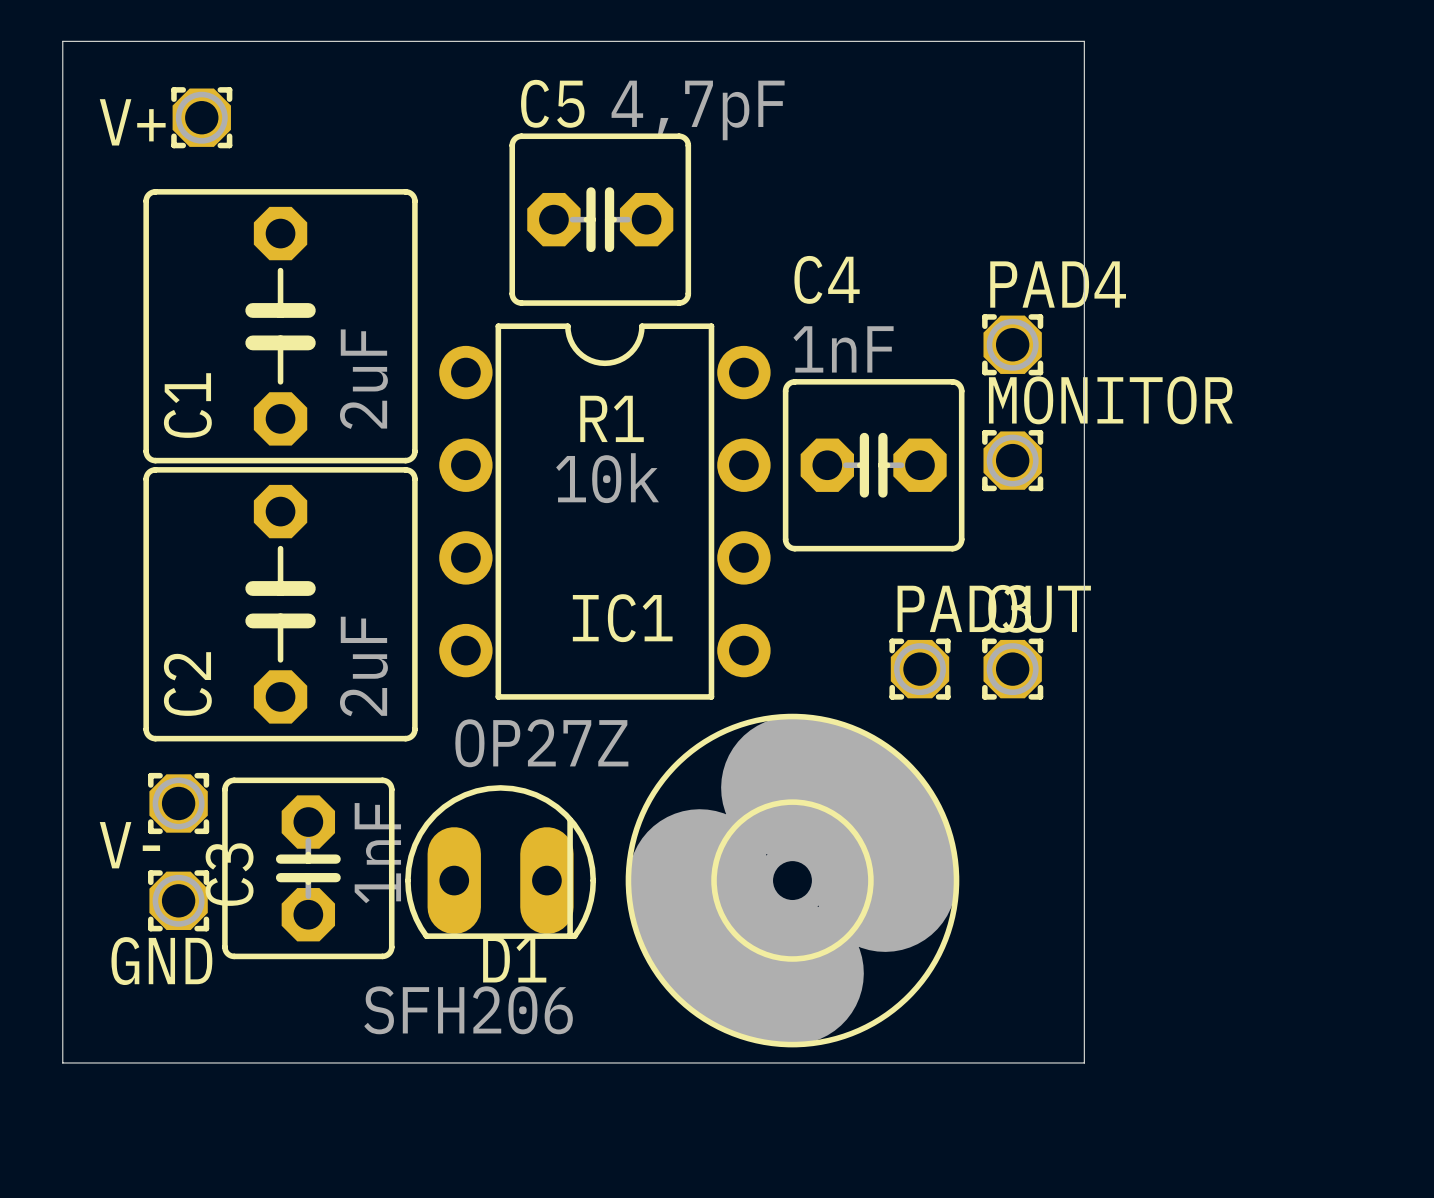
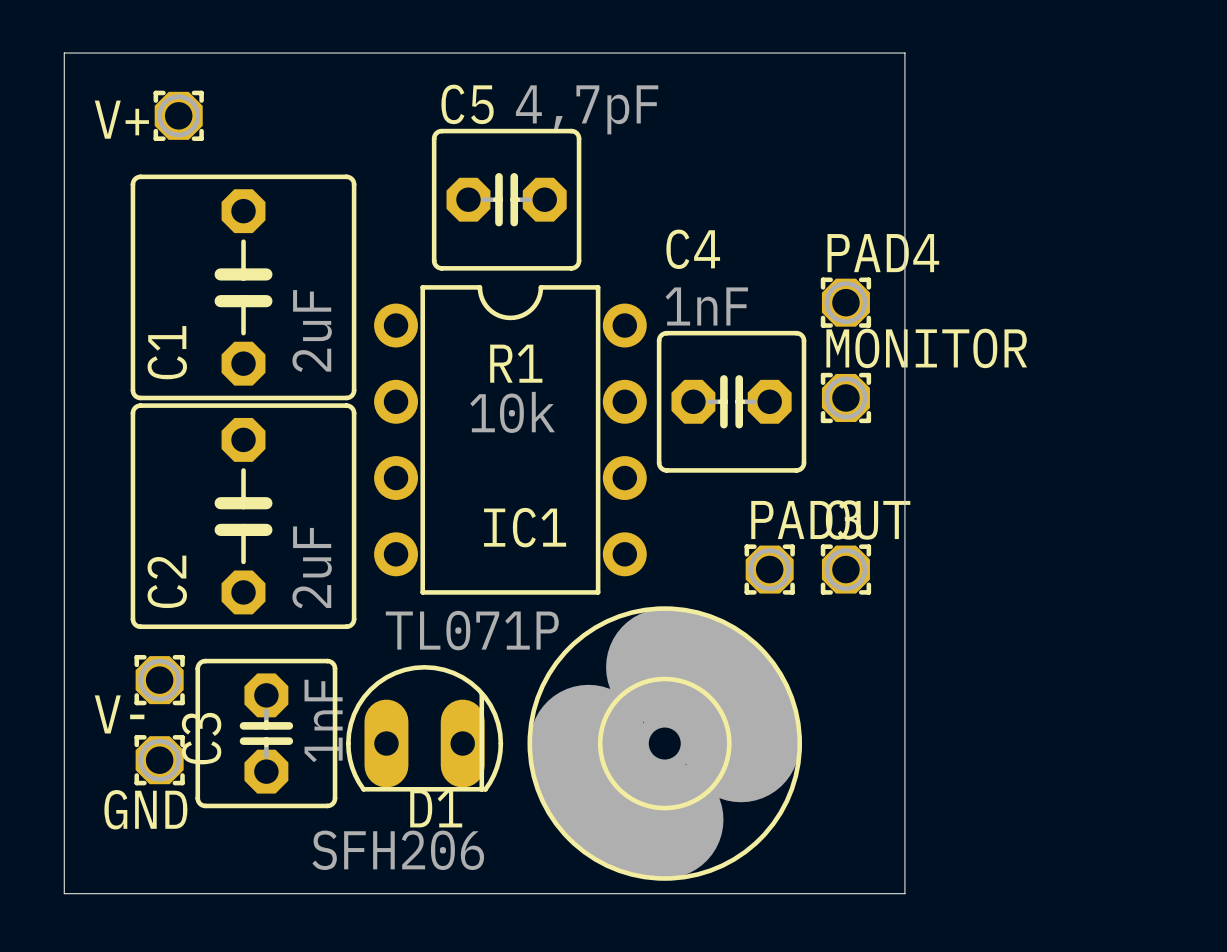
IC1 value: OP27Z (541, 743) -> TL071P (472, 630)

